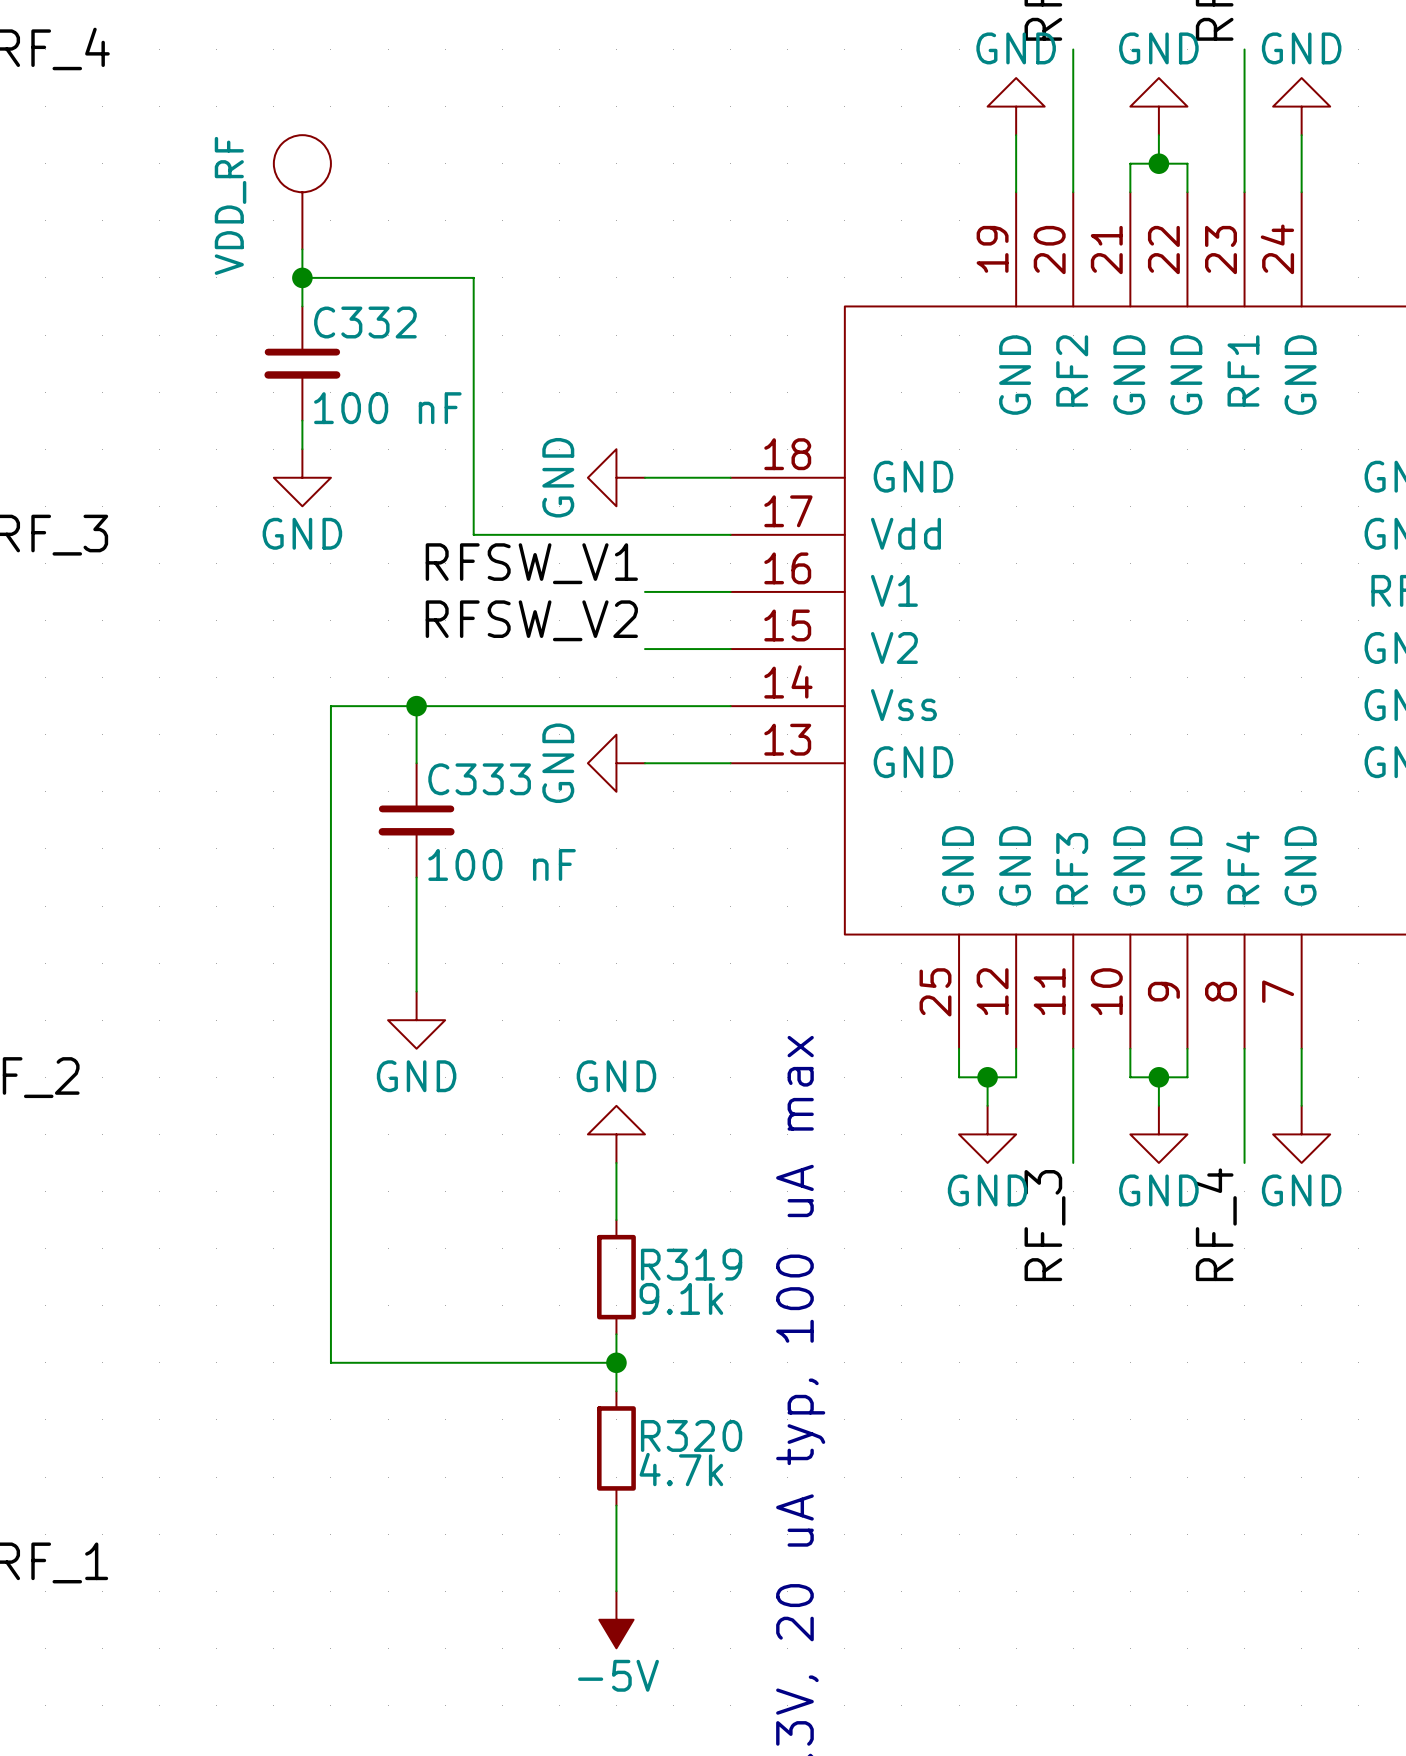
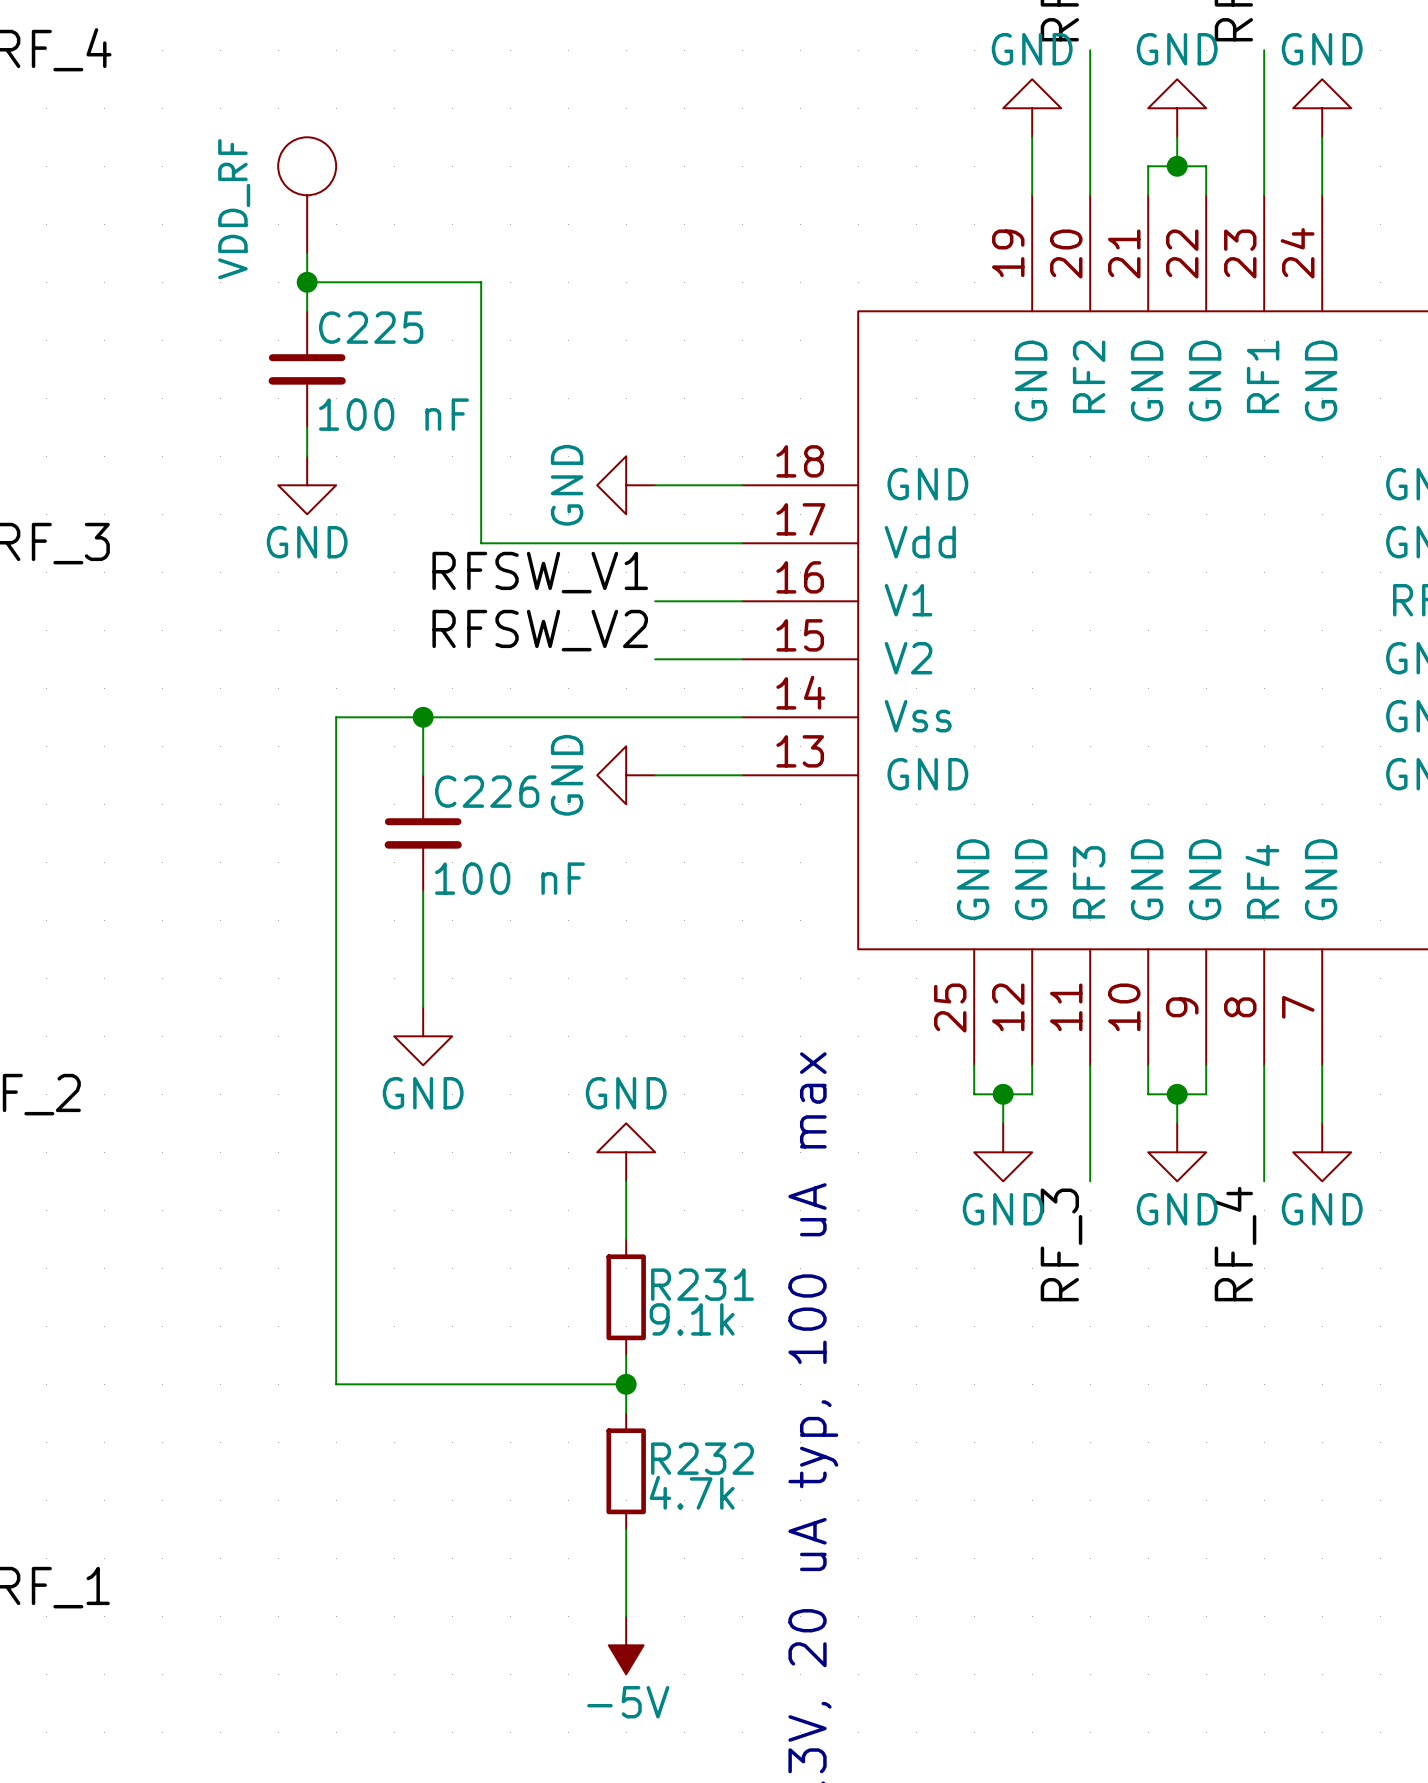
C332 name: C332 (365, 322) -> C225 (371, 327)
C333 name: C333 (479, 779) -> C226 (487, 791)
R319 name: R319 (691, 1264) -> R231 (702, 1284)
R320 name: R320 (691, 1435) -> R232 (702, 1458)

